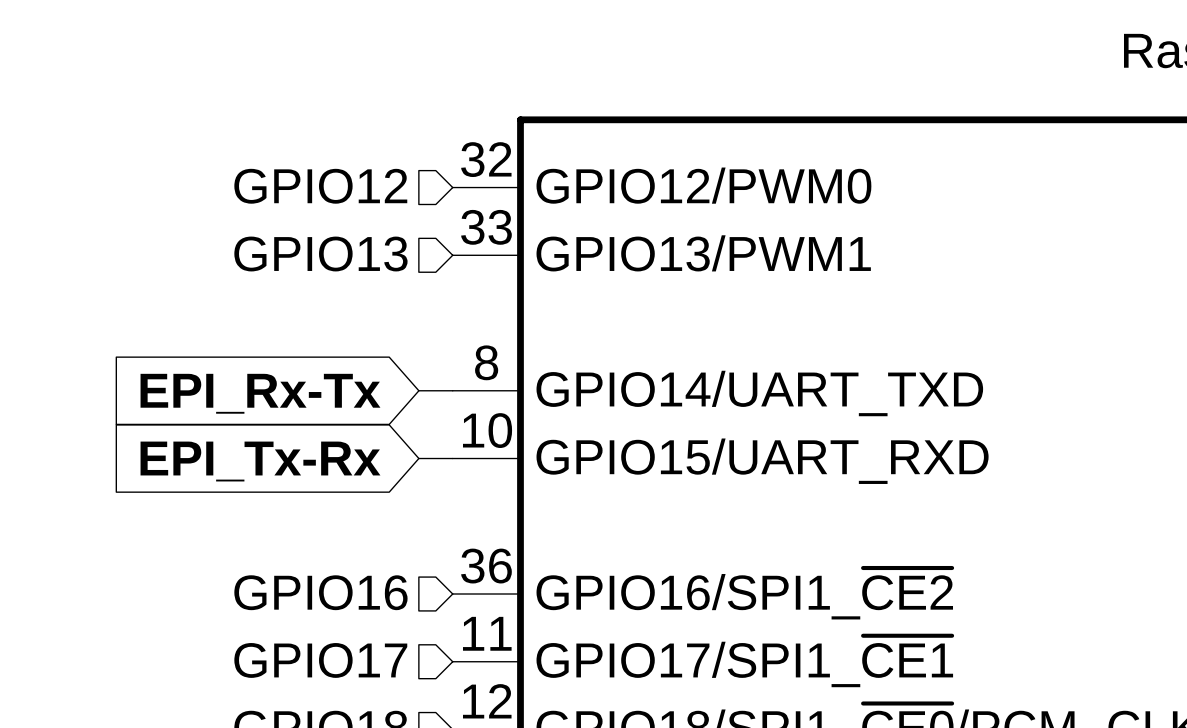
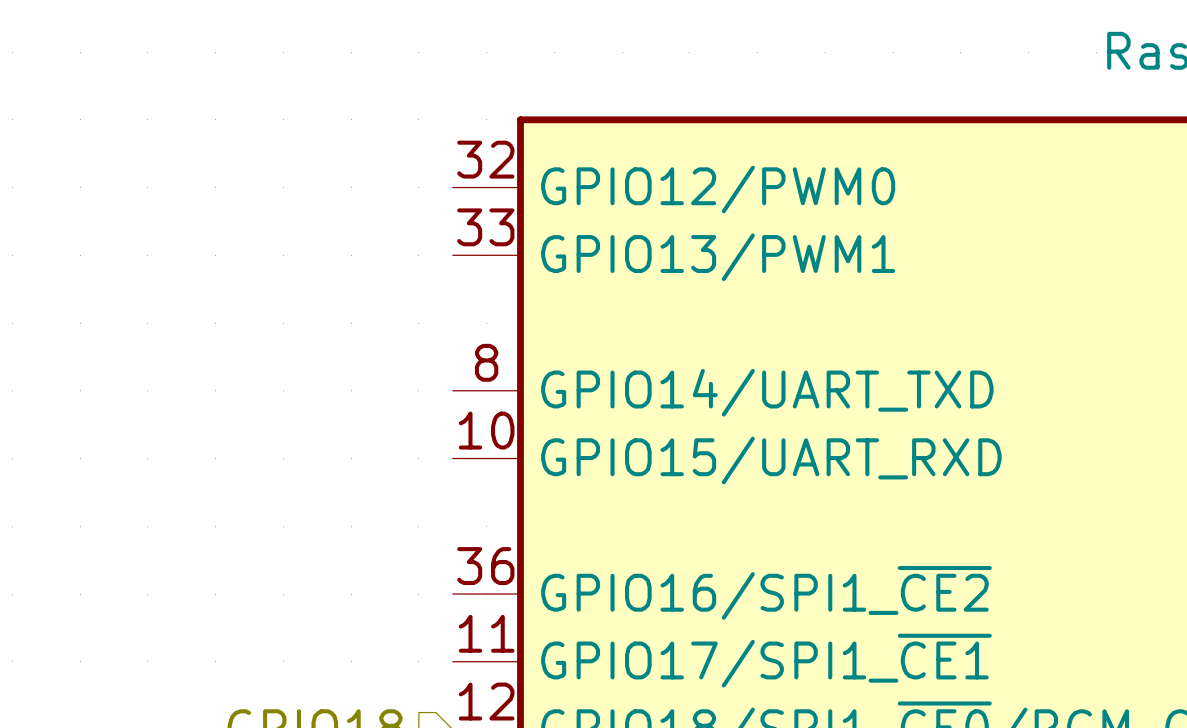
hierarchical label: GPIO12 (320, 186) -> none
hierarchical label: GPIO13 (320, 254) -> none
wire: (418, 390) (452, 390) -> none
global label: EPI_Rx-Tx (260, 393) -> none
wire: (418, 458) (452, 458) -> none
global label: EPI_Tx-Rx (260, 461) -> none
hierarchical label: GPIO16 (320, 592) -> none
hierarchical label: GPIO17 (320, 660) -> none

